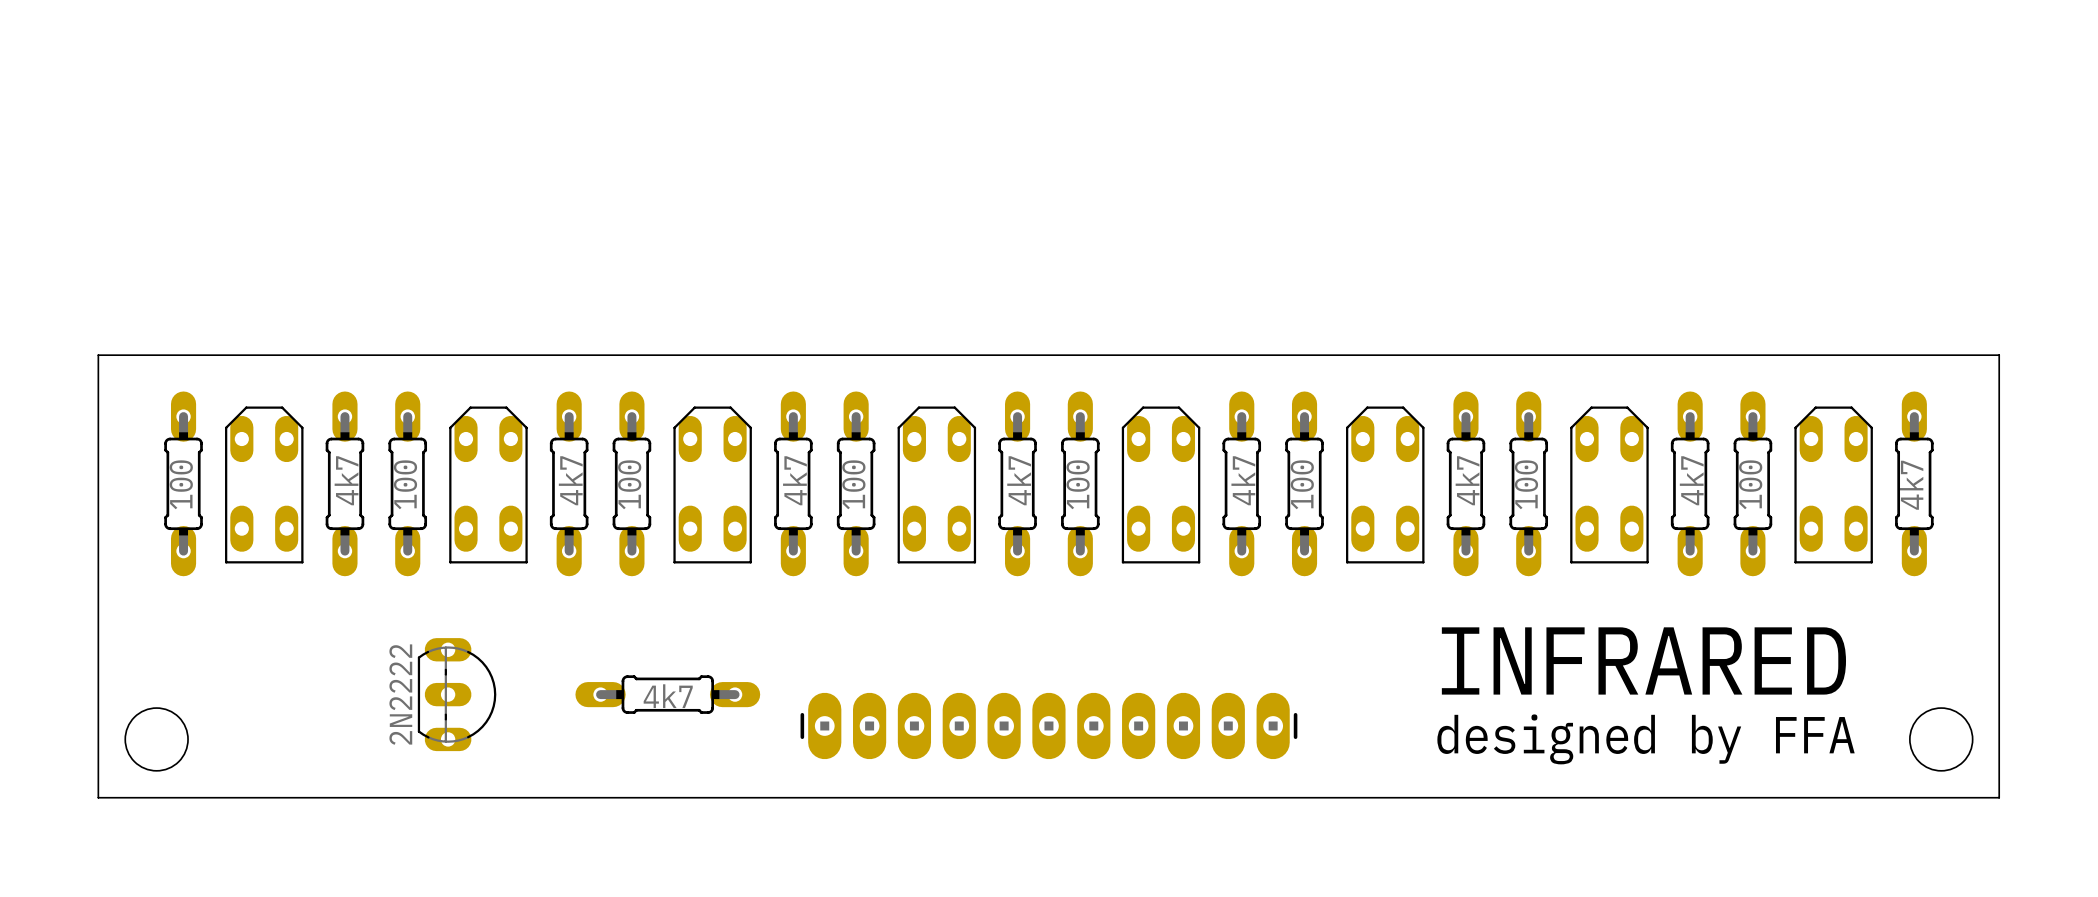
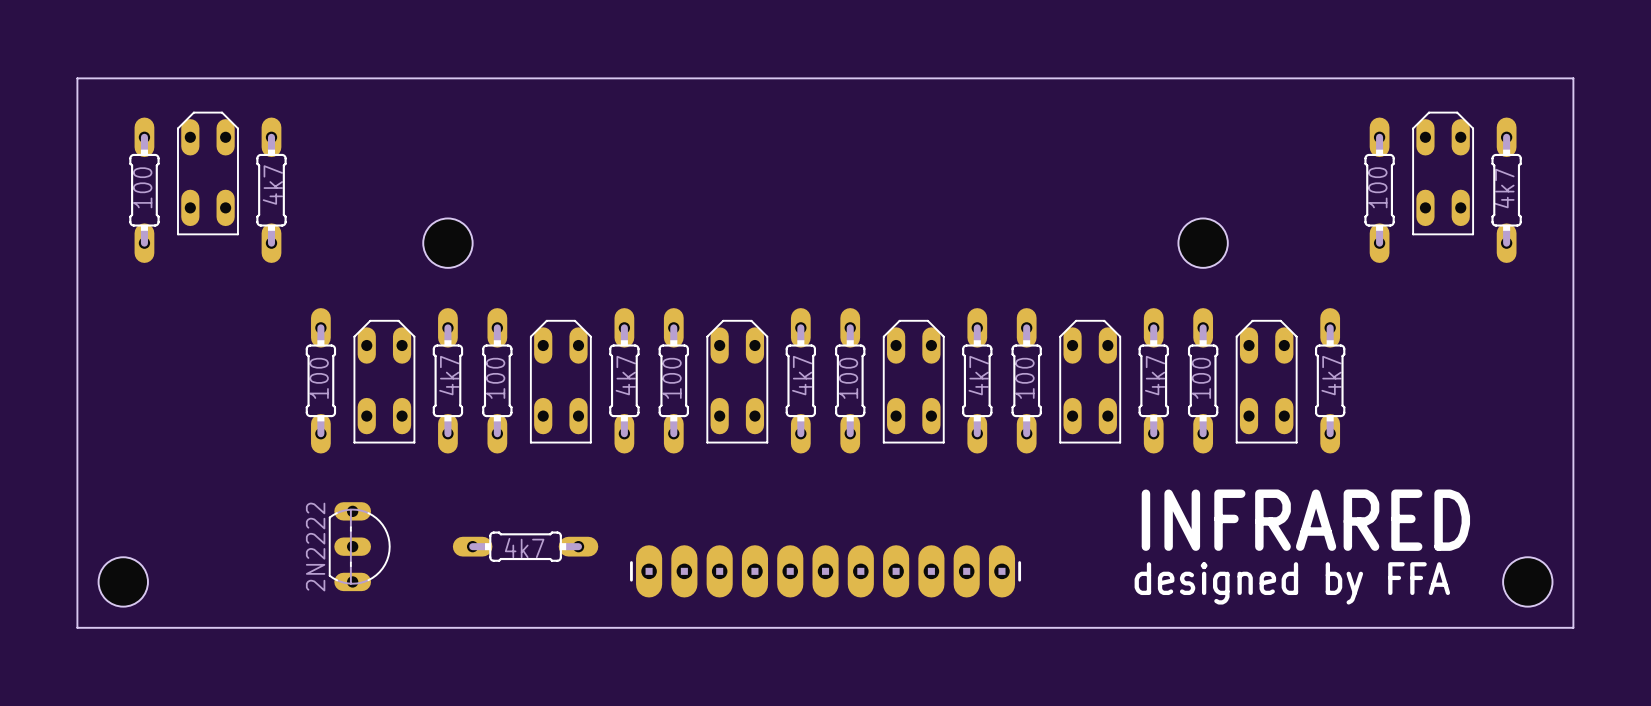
hole: none -> (447, 243)
hole: none -> (1203, 243)
board edge: (98, 355) (1999, 355) -> (77, 279) (77, 78) (1573, 78) (1573, 279)
part position: (183, 483) -> (144, 190)
part position: (344, 483) -> (271, 190)
part position: (1752, 483) -> (1379, 190)
part position: (1914, 483) -> (1506, 190)
part position: (264, 484) -> (207, 173)
part position: (1833, 484) -> (1443, 173)

